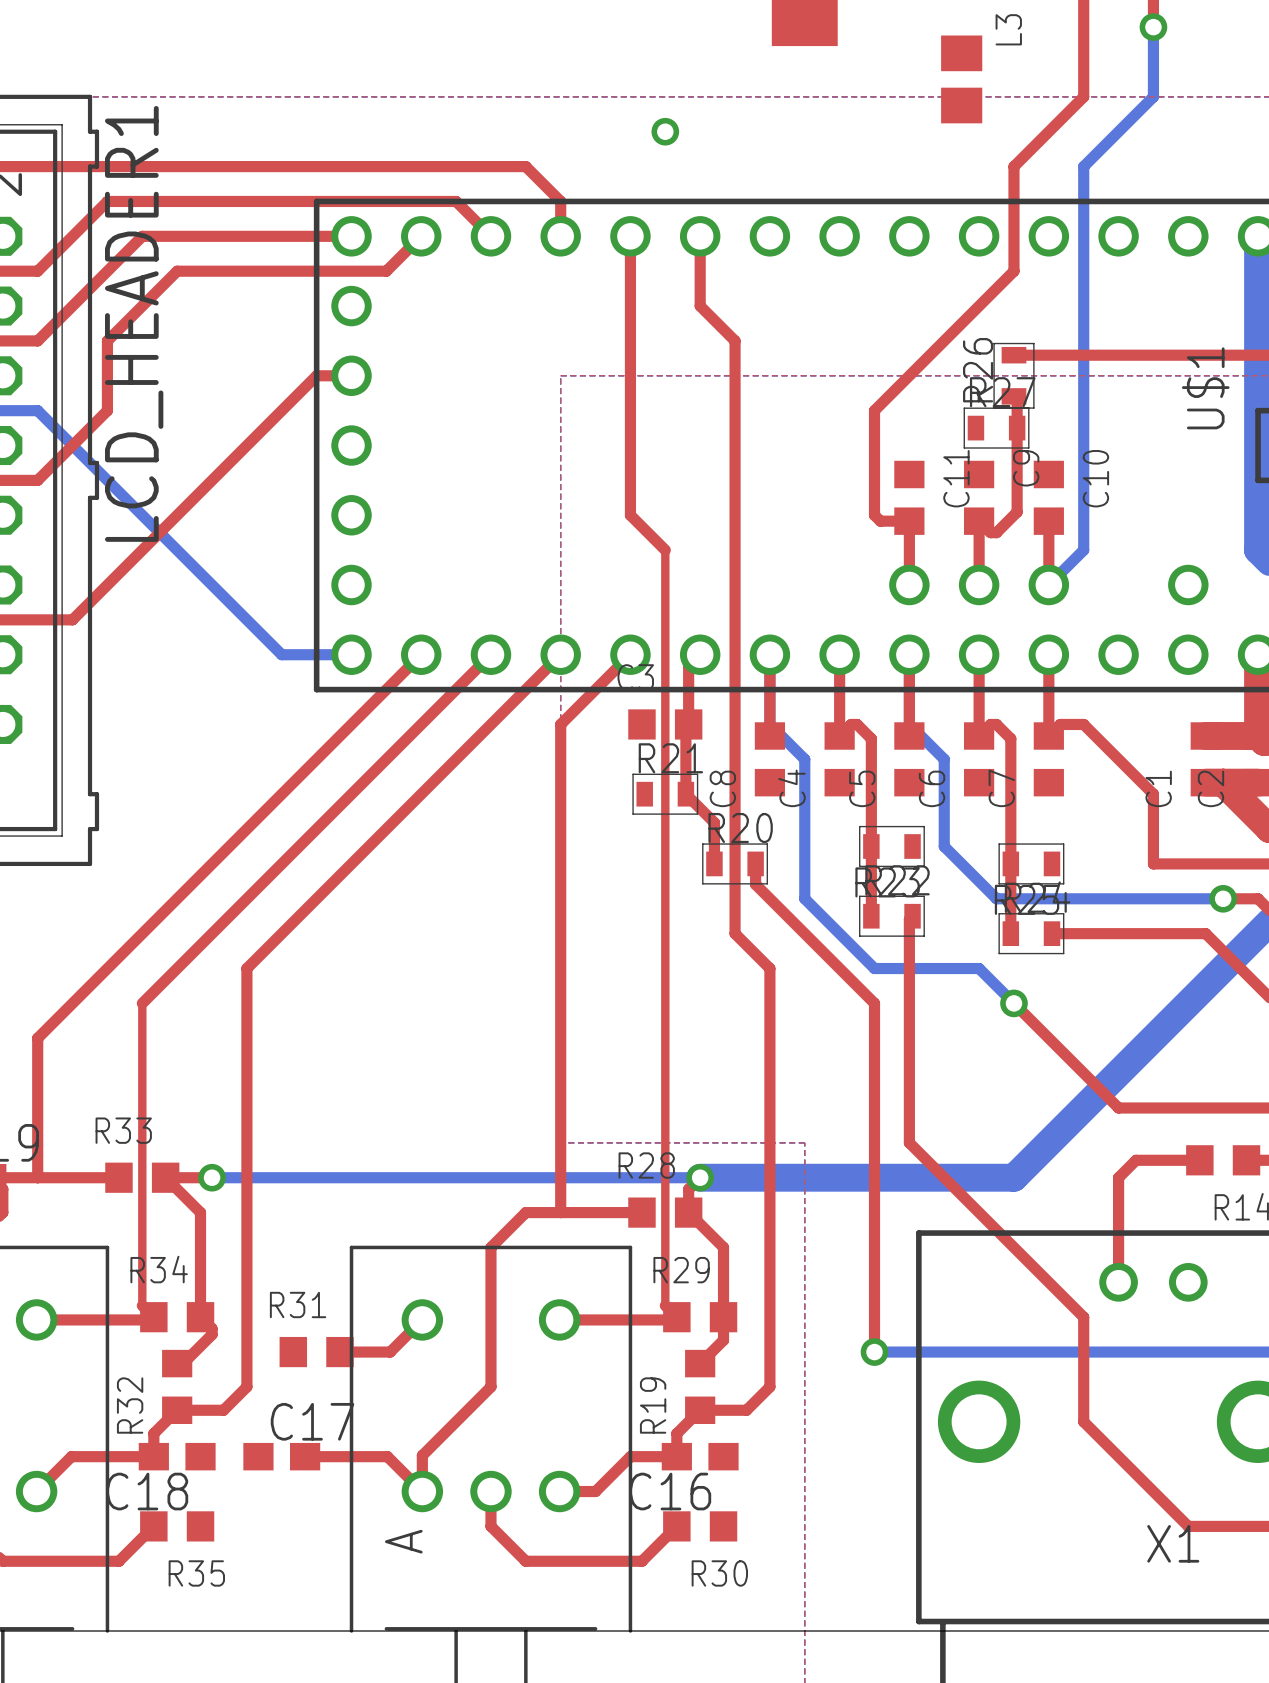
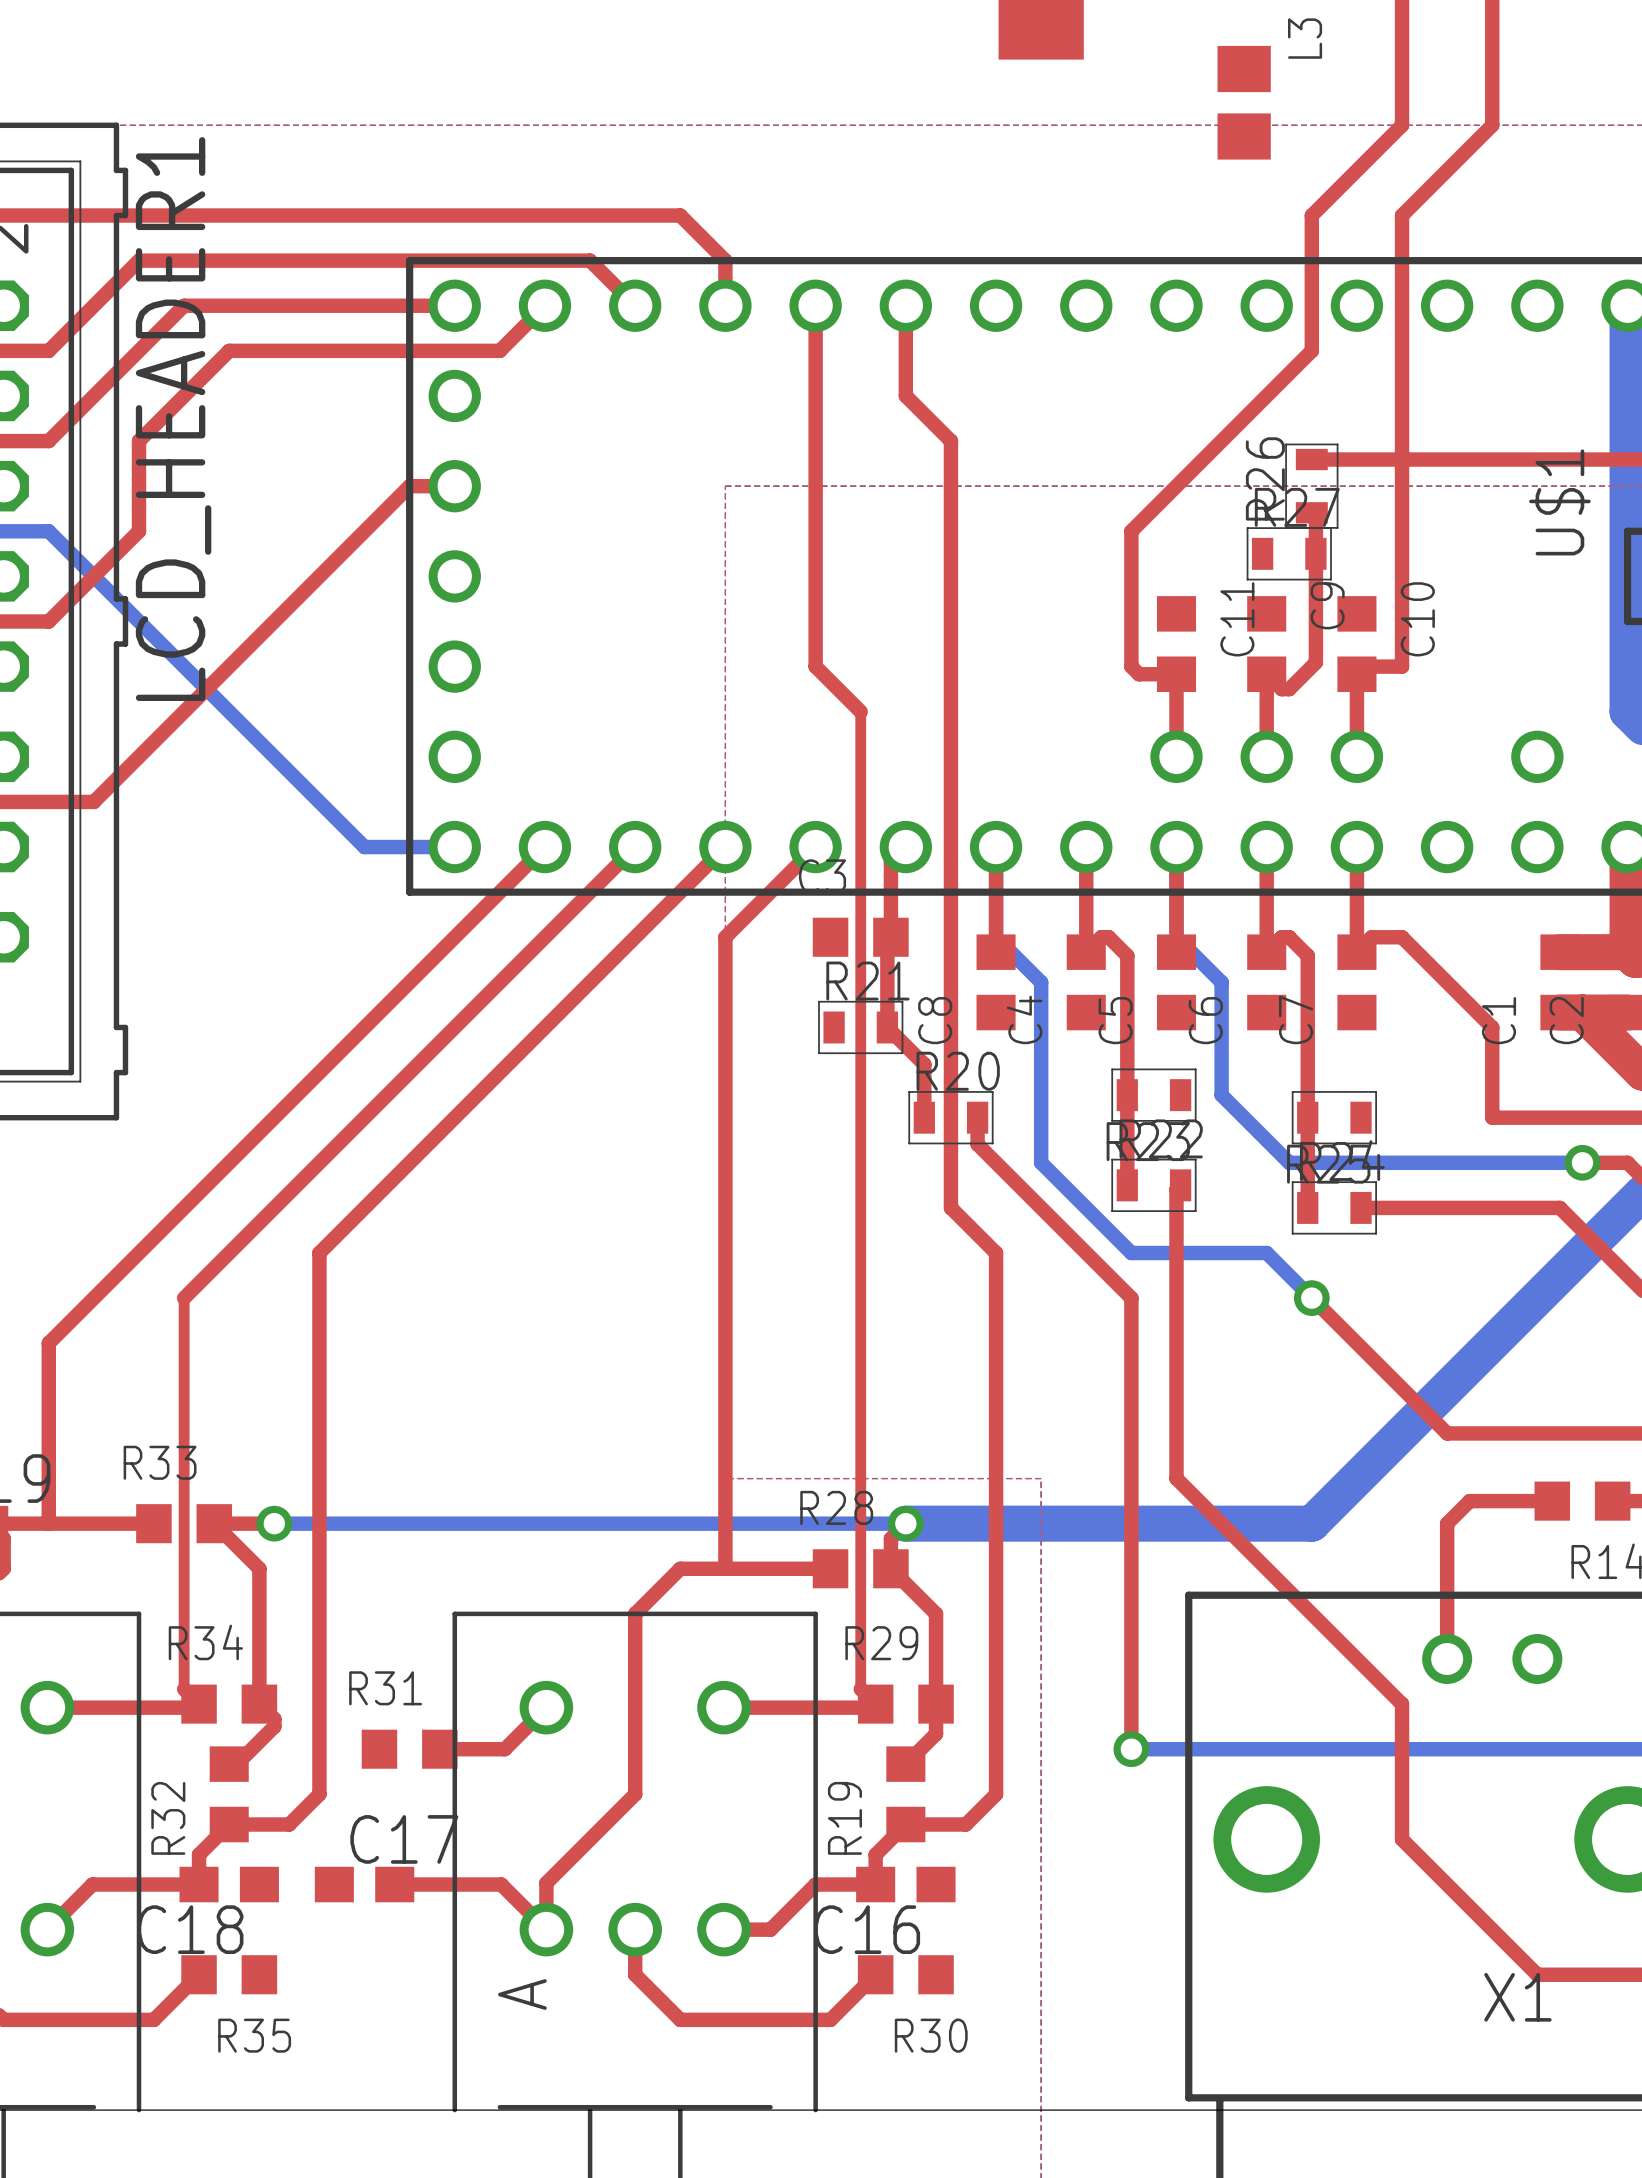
top track: none -> (1492, 35) (1492, 125) (1402, 215) (1402, 666) (1364, 666)
bottom track: (1153, 27) (1153, 96) (1083, 166) (1083, 550) (1048, 584) -> none
via: (1153, 27) -> none
via: (665, 131) -> none

